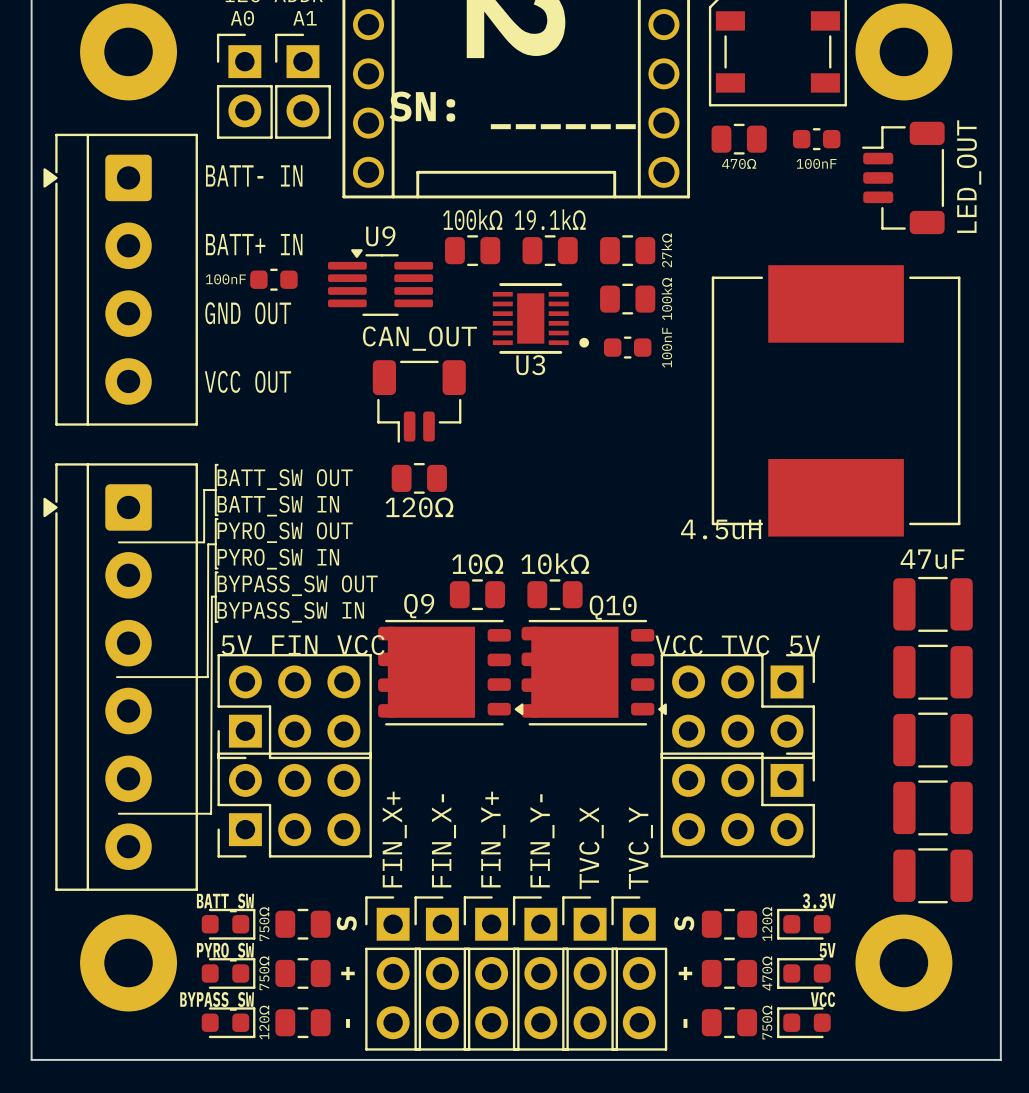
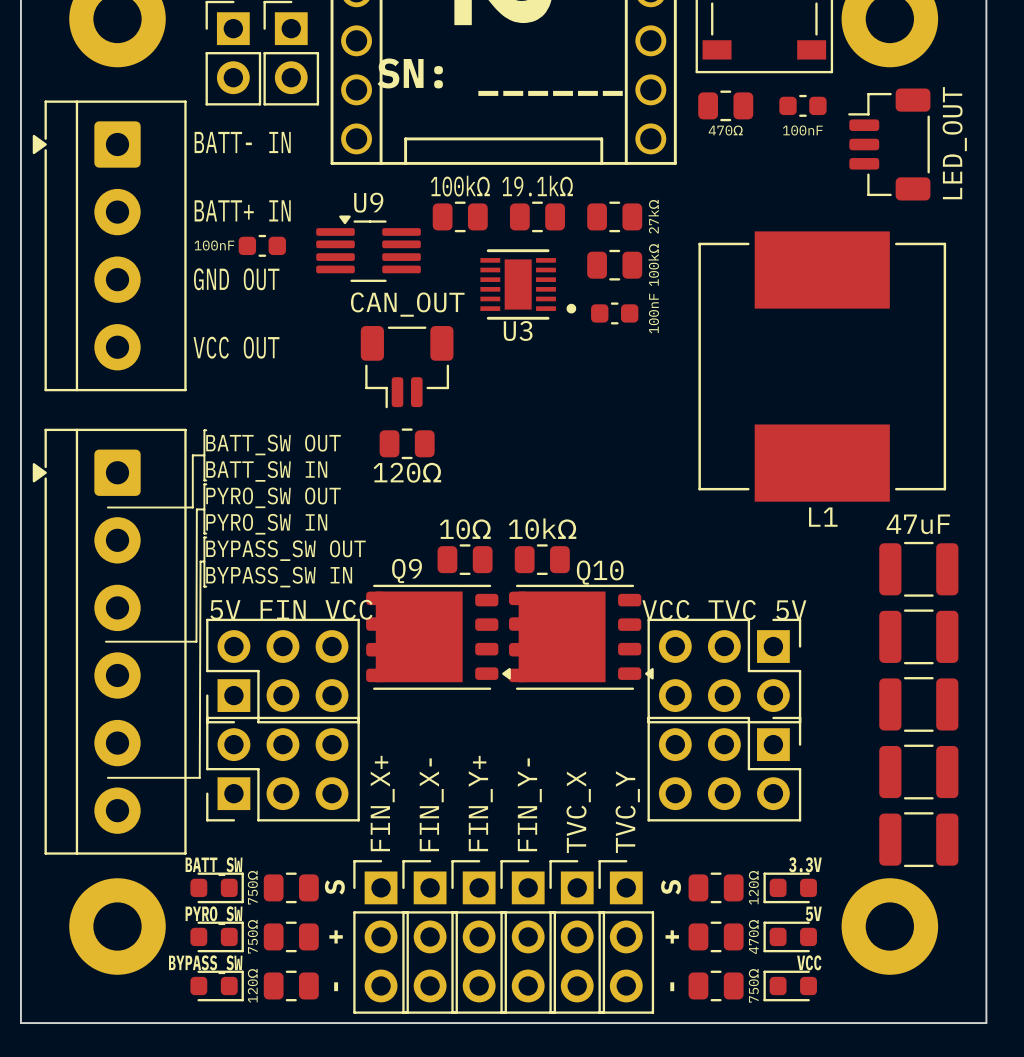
L1 value: 4.5uH (721, 529) -> none
L1 name: none -> L1 (823, 517)

